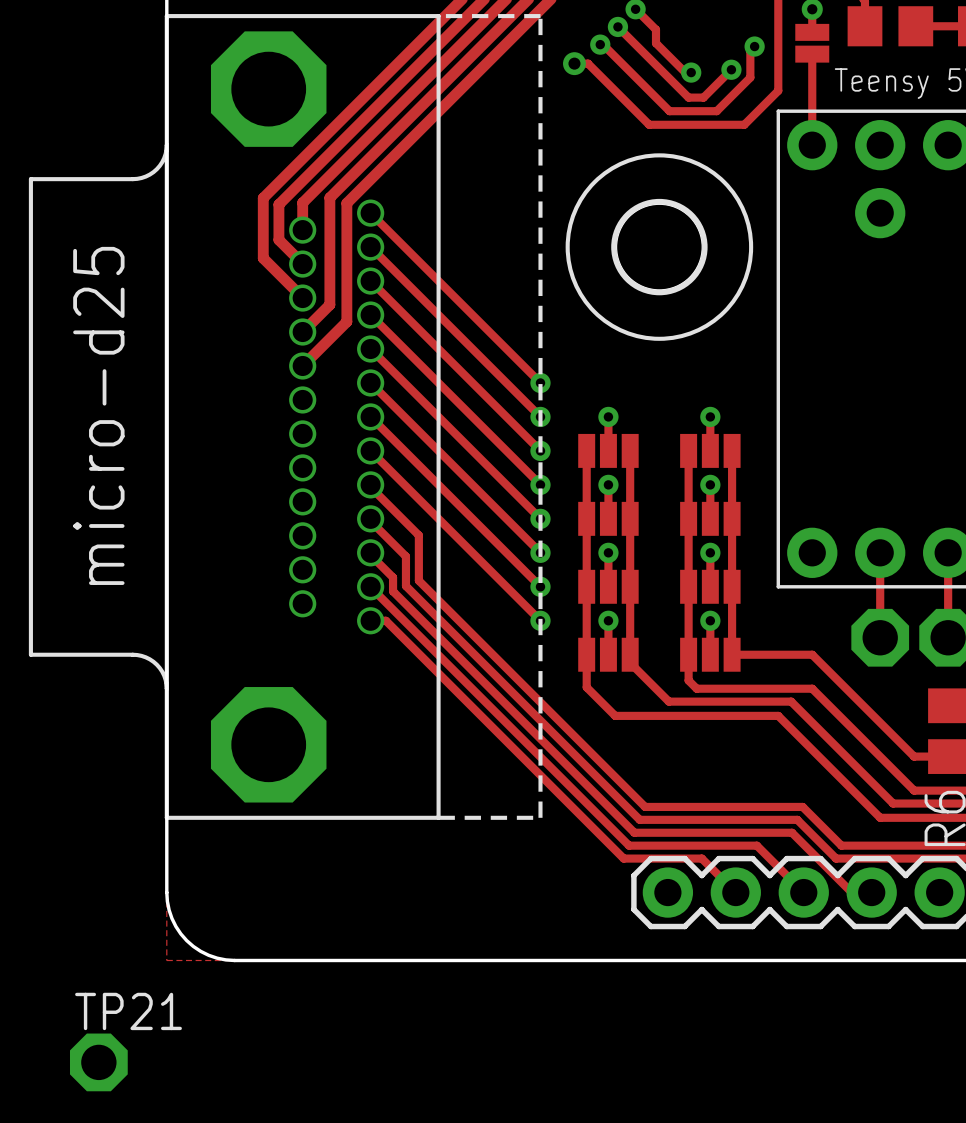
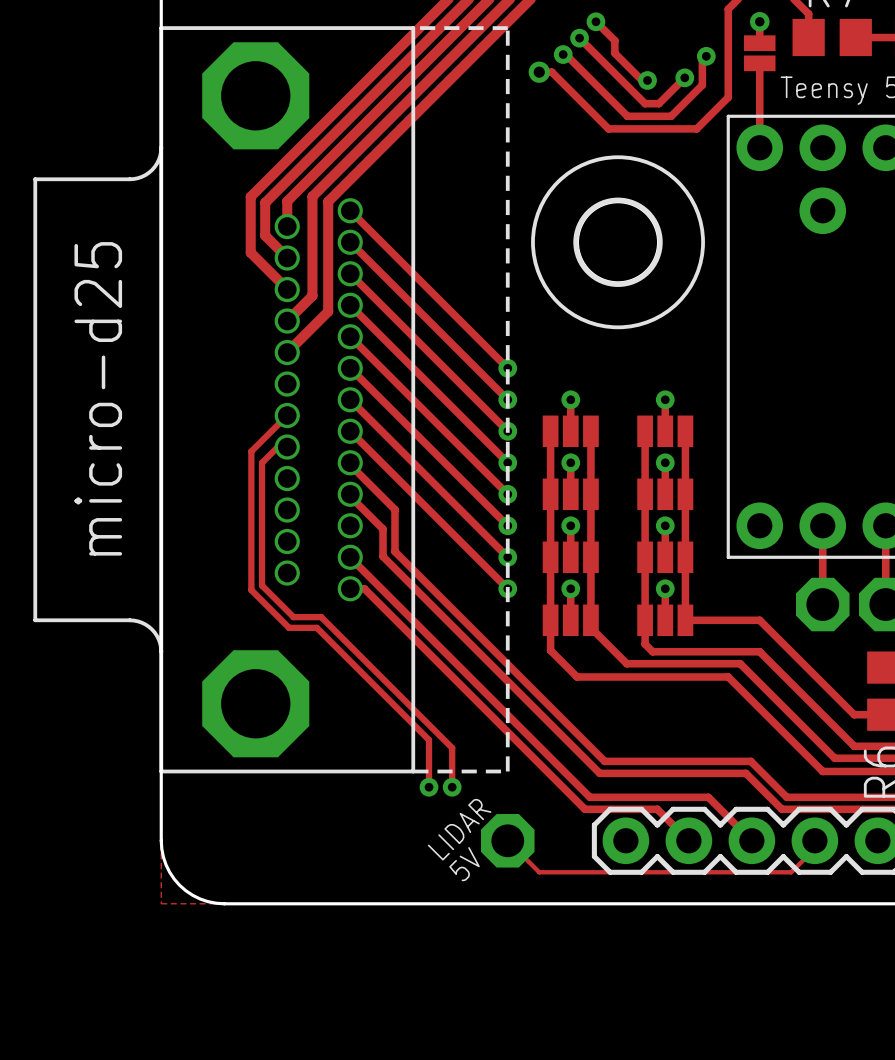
track: none -> (287, 415) (251, 451) (251, 590) (289, 627) (316, 627) (429, 739) (429, 787)
track: none -> (287, 447) (277, 447) (262, 462) (262, 585) (293, 617) (321, 617) (452, 748) (452, 787)
track: (370, 555) (393, 577) (393, 591) (634, 832) (792, 832) (851, 892) (871, 892) -> (507, 840) (539, 872) (791, 872) (814, 848) (814, 840)
via: none -> (429, 787)
via: none -> (452, 787)
text: none -> LIDAR (459, 829)
part: none -> (507, 840)
text: none -> 5V (464, 864)
TP21: (98, 1062) -> none

